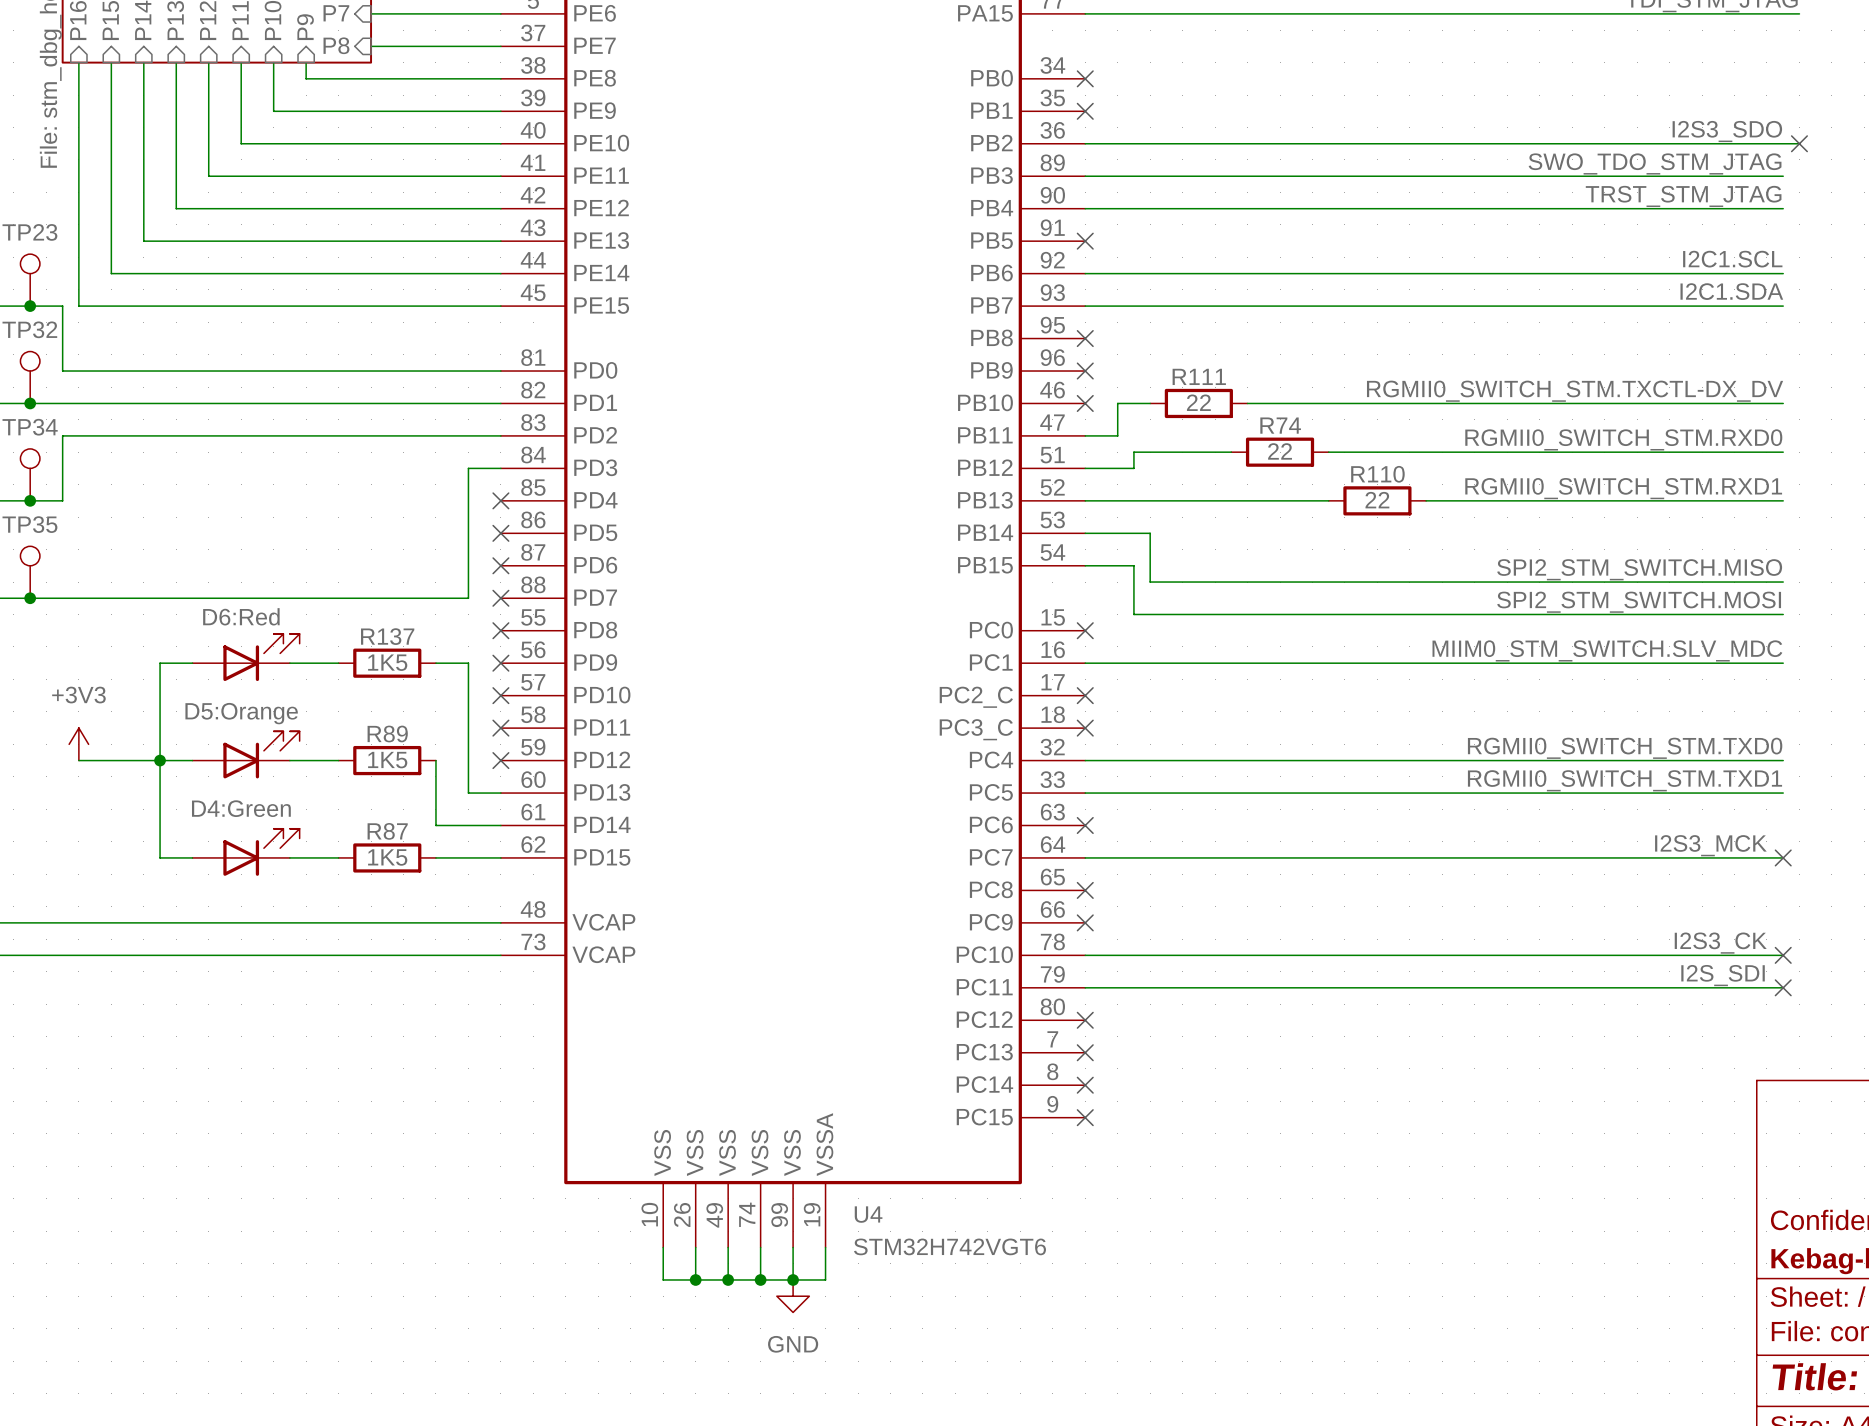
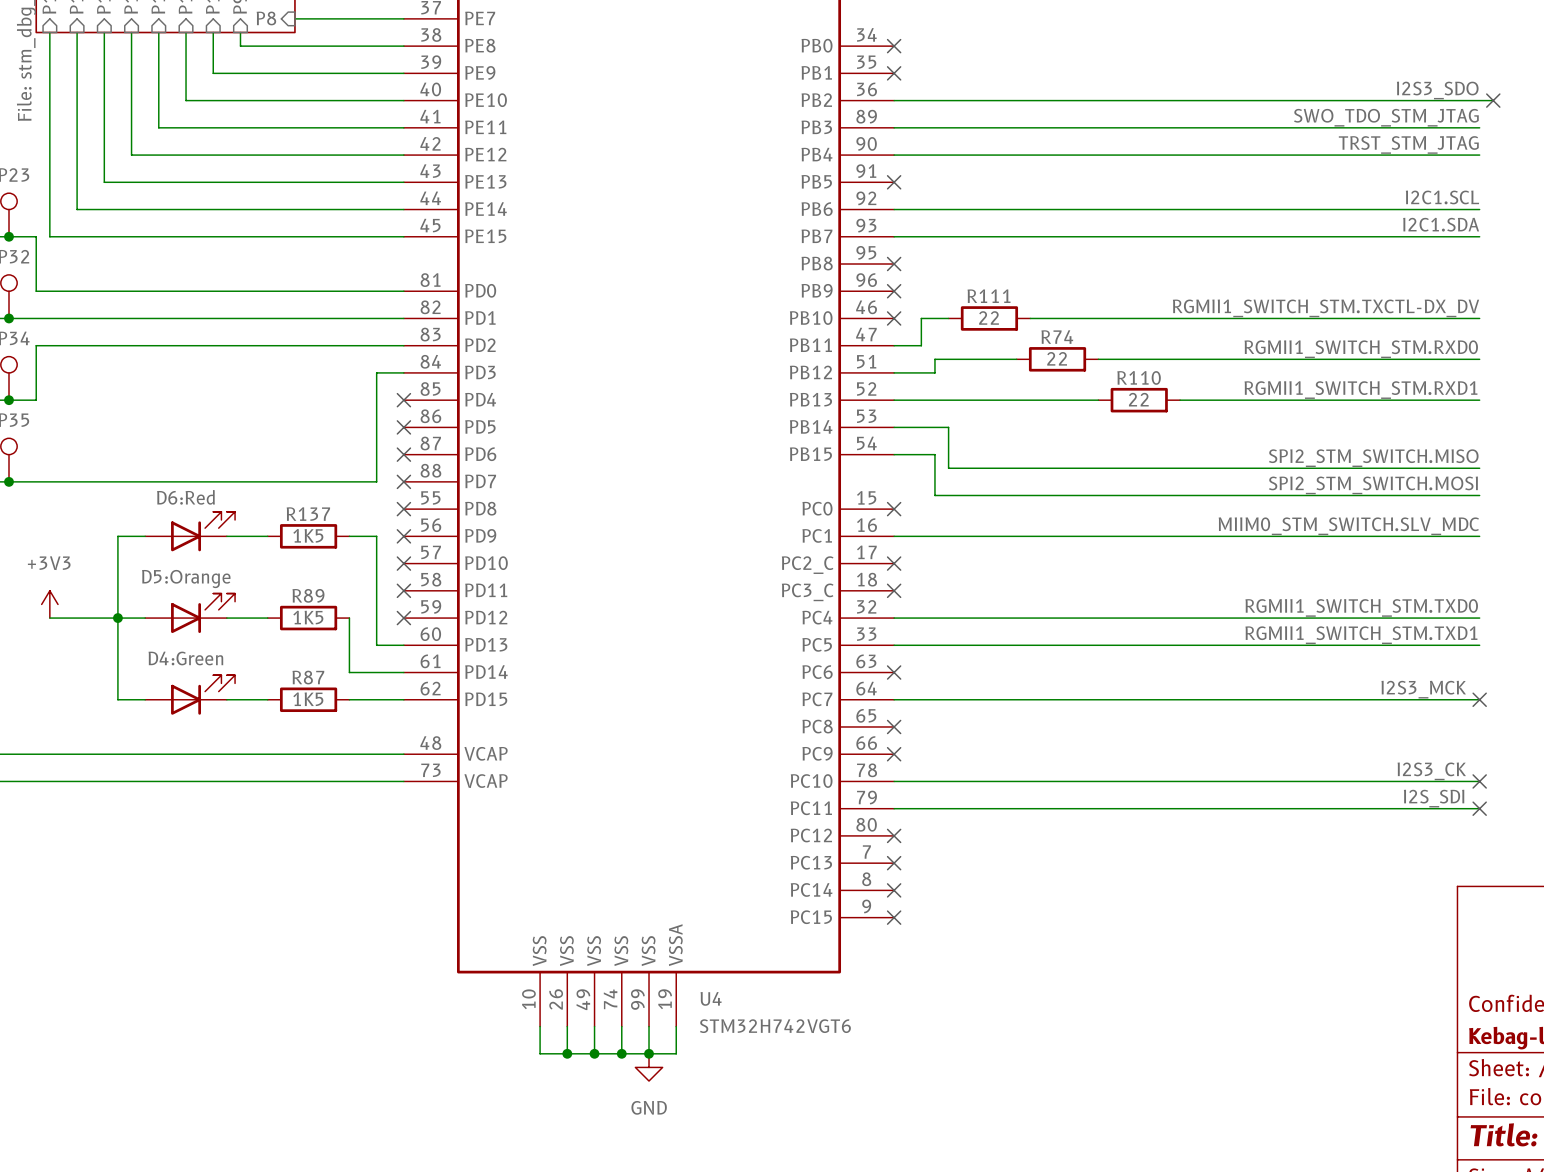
label: RGMII0_SWITCH_STM.TXCTL-DX_DV (1575, 391) -> RGMII1_SWITCH_STM.TXCTL-DX_DV (1326, 308)
label: RGMII0_SWITCH_STM.RXD0 (1623, 439) -> RGMII1_SWITCH_STM.RXD0 (1361, 349)
label: RGMII0_SWITCH_STM.RXD1 (1623, 488) -> RGMII1_SWITCH_STM.RXD1 (1360, 390)
label: RGMII0_SWITCH_STM.TXD0 (1625, 748) -> RGMII1_SWITCH_STM.TXD0 (1361, 607)
label: RGMII0_SWITCH_STM.TXD1 (1624, 780) -> RGMII1_SWITCH_STM.TXD1 (1361, 635)

